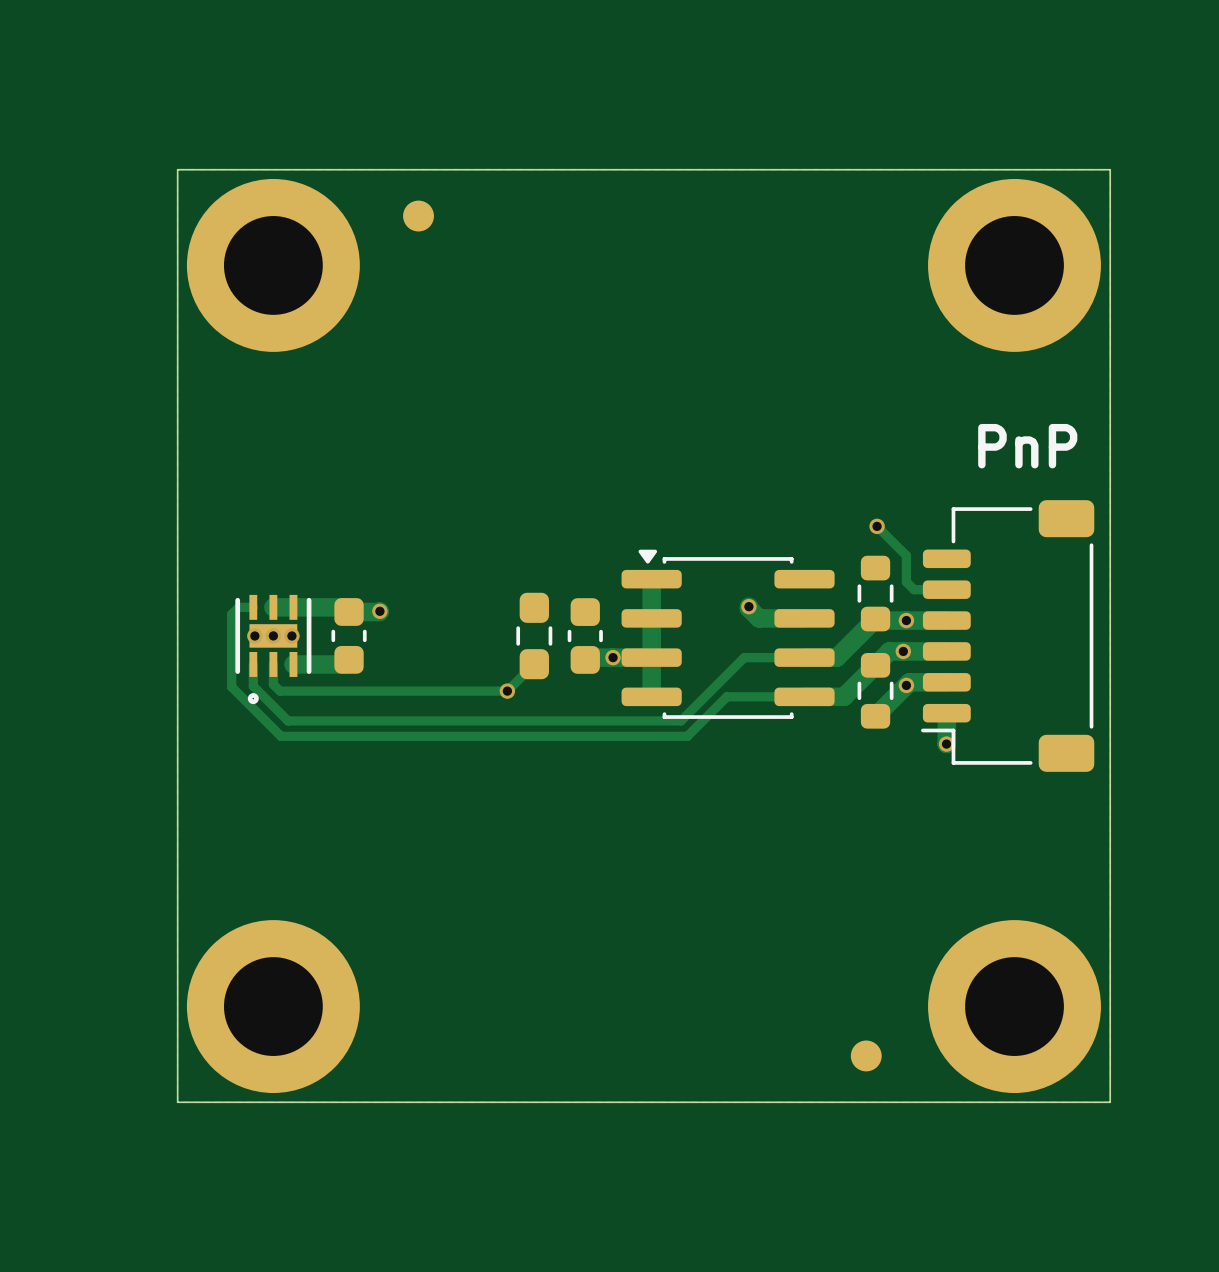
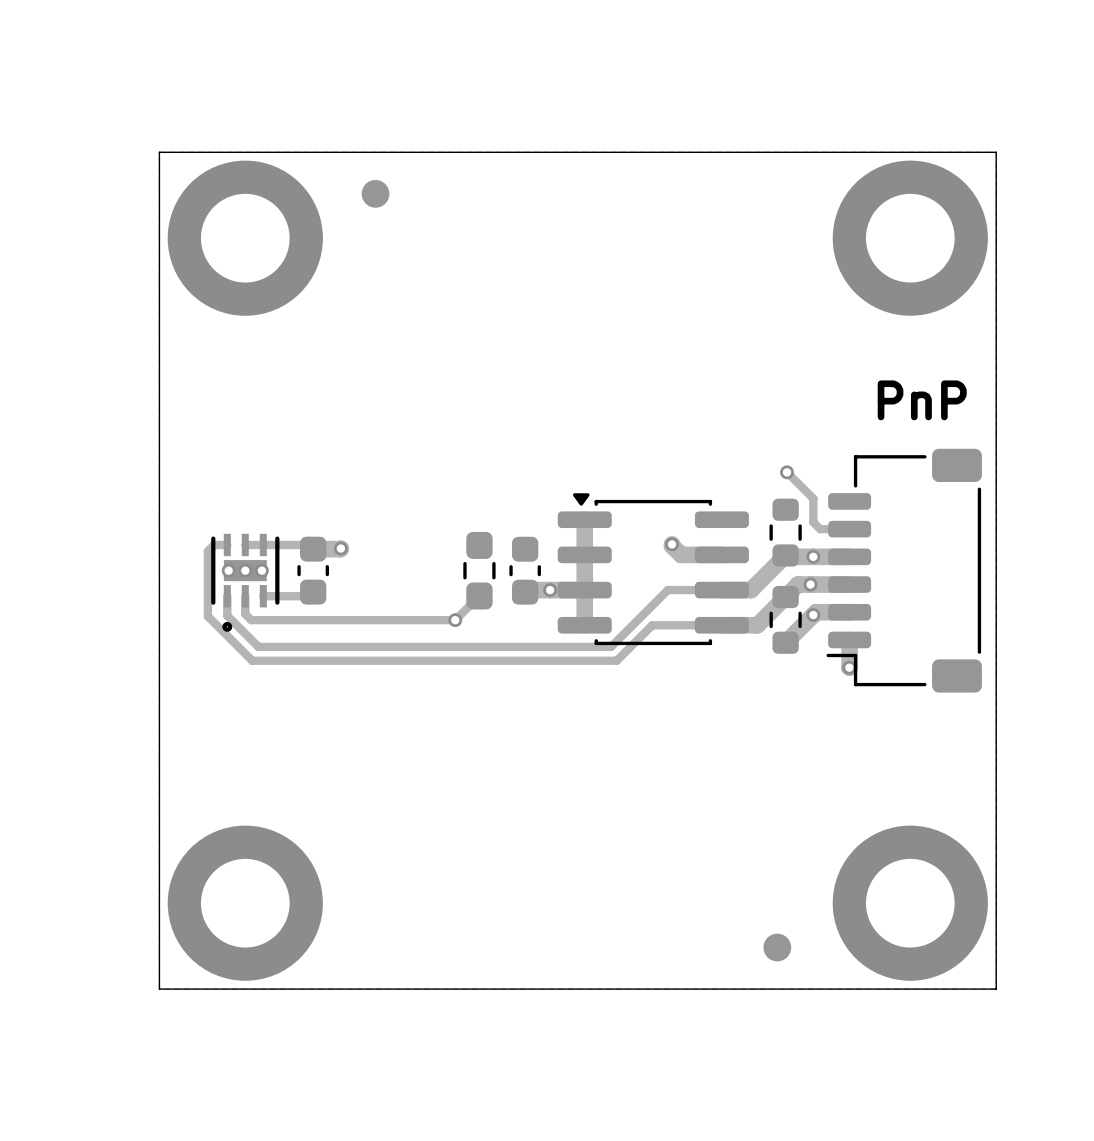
track width: thick (273, 607) (344, 607) -> thin (245, 545) (309, 545)
track width: thick (293, 664) (344, 664) -> thin (263, 596) (309, 596)

